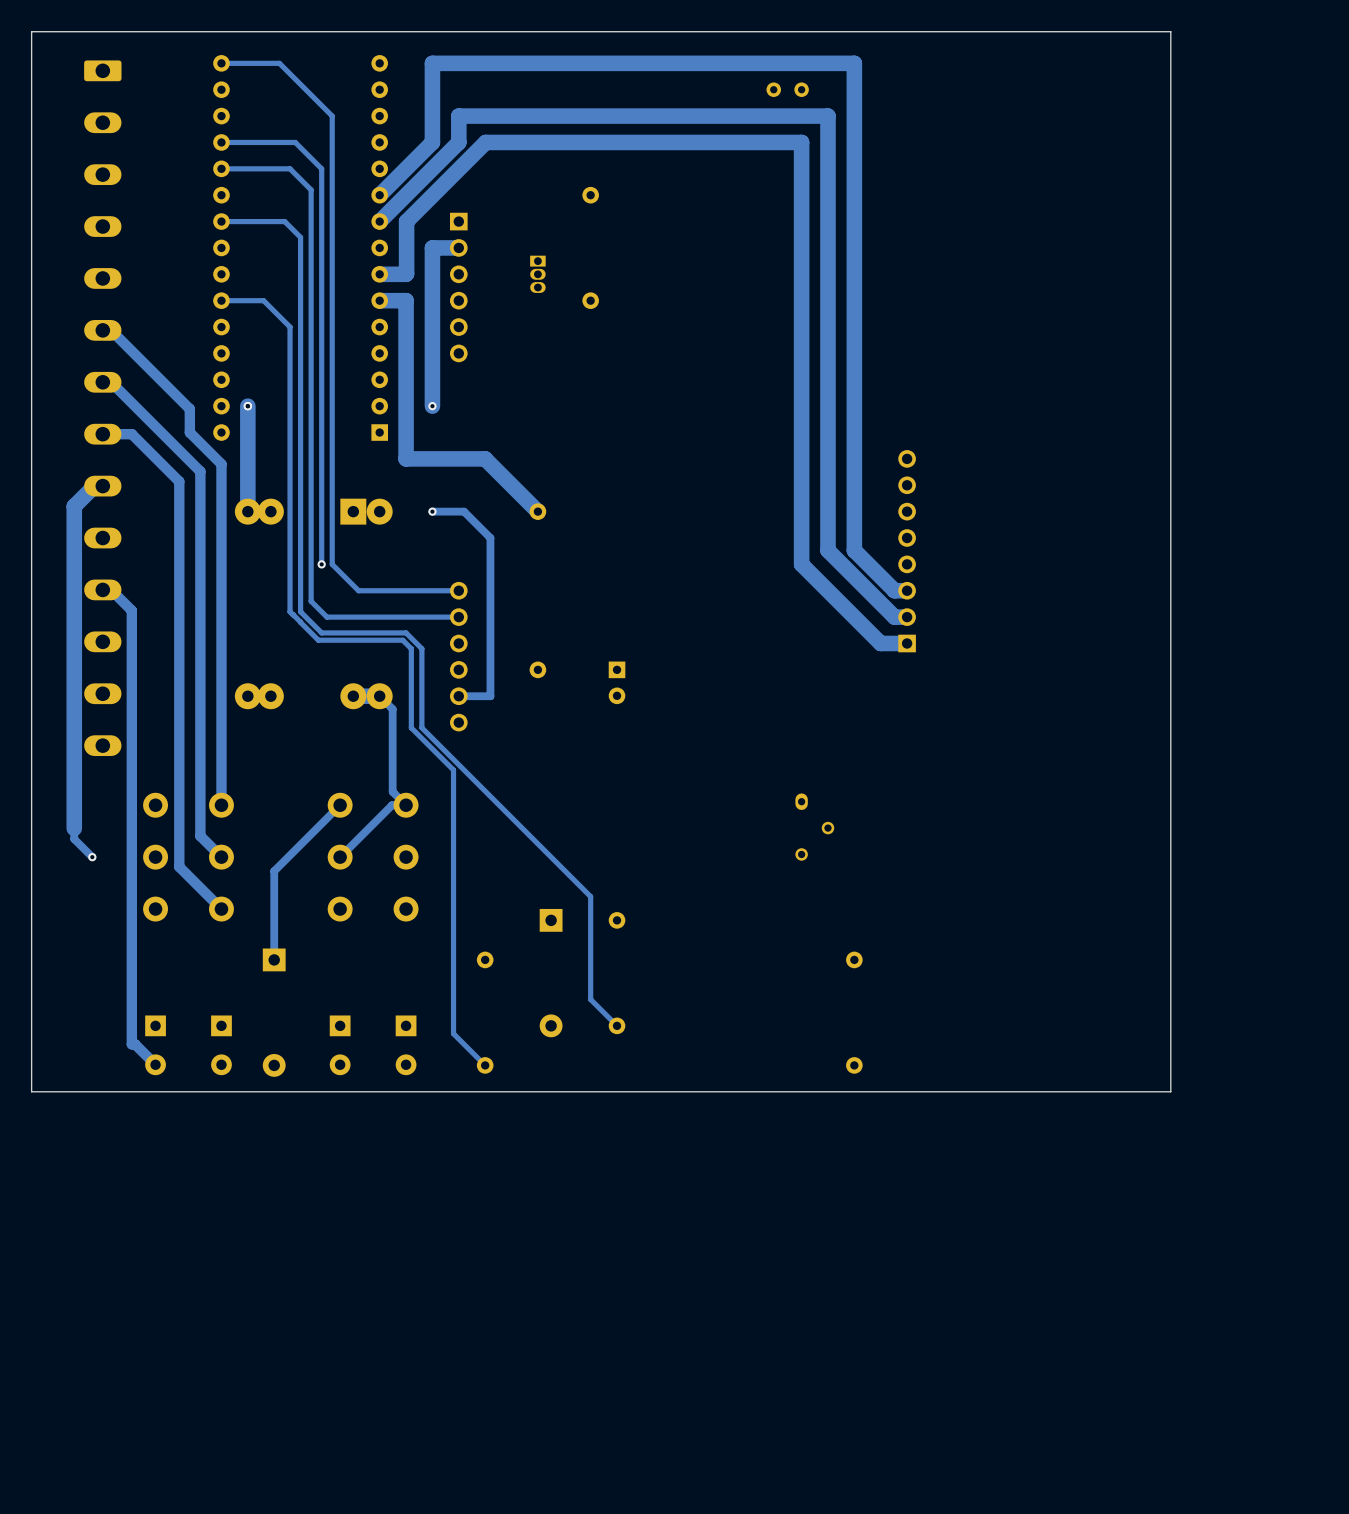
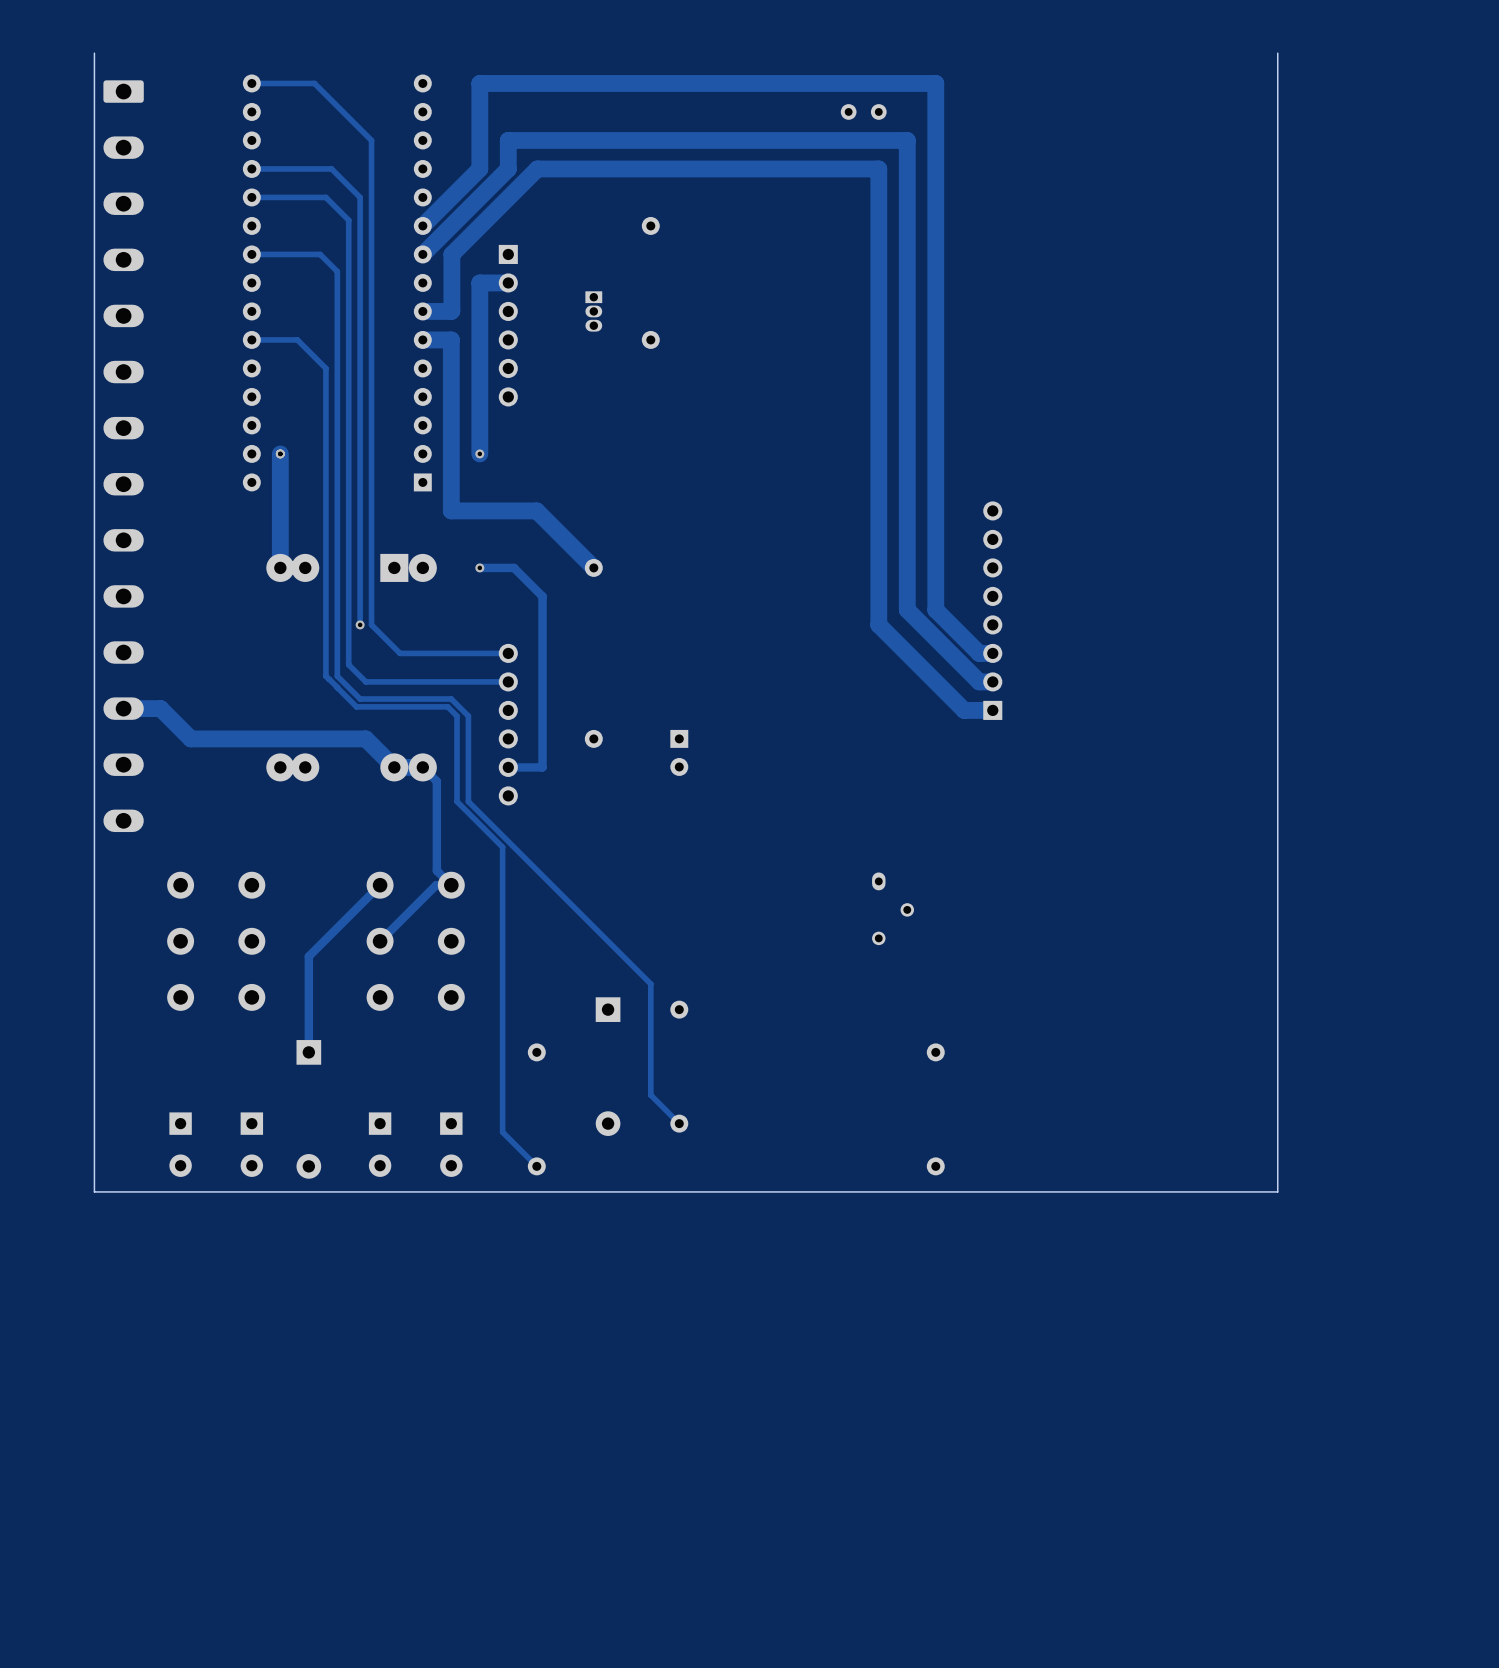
board edge: (1170, 35) (1170, 31) (31, 31) (31, 1091) (1170, 1091) (1170, 1089) -> (94, 53) (94, 1191) (1277, 1191)
track: (102, 330) (111, 330) (189, 409) (189, 432) (221, 464) (221, 805) -> none
track: (102, 382) (111, 382) (200, 471) (200, 836) (221, 857) -> none
track: (102, 434) (131, 434) (179, 481) (179, 866) (221, 909) -> none
track: (102, 486) (94, 486) (74, 506) (74, 839) (92, 857) -> none
track: (102, 589) (111, 589) (131, 610) (131, 1044) (135, 1044) (155, 1064) -> none
track: none -> (123, 708) (160, 708) (190, 738) (365, 738) (394, 767)
via: (92, 857) -> none

